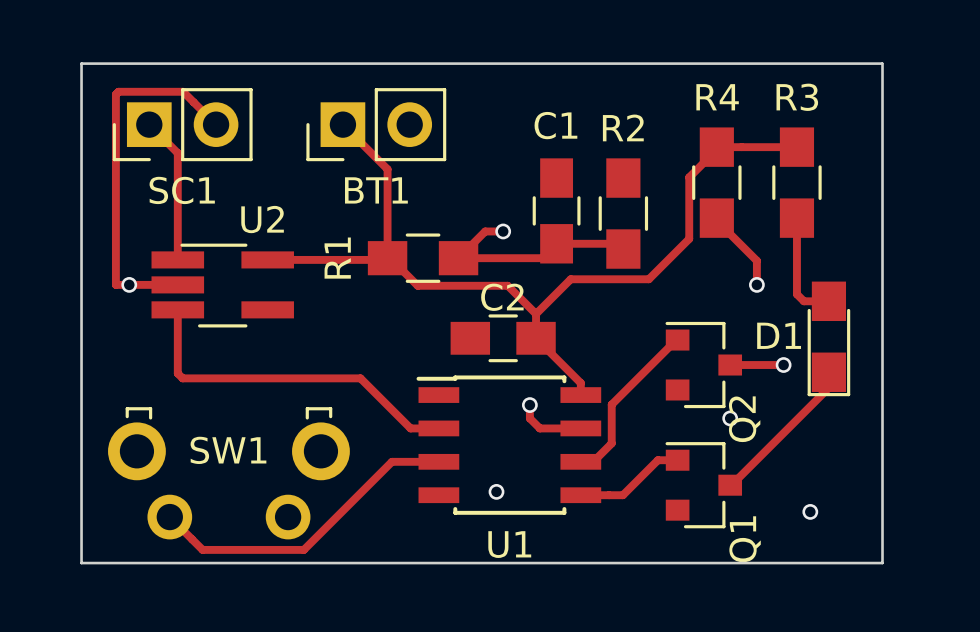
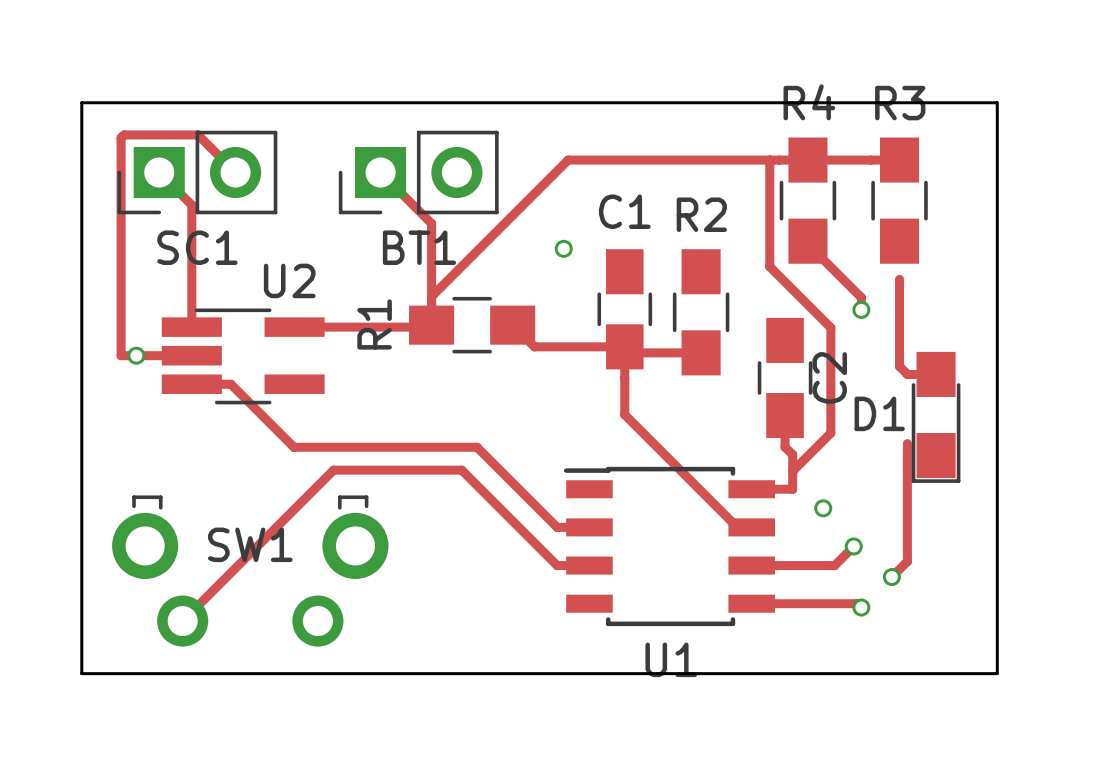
track: none -> (769, 160) (769, 266) (830, 327) (830, 433) (792, 471)
track: none -> (899, 160) (568, 160) (431, 296)
track: (796, 147) (716, 147) (716, 149) (689, 177) (689, 238) (648, 279) (570, 279) (536, 313) -> none
R4 position: (716, 182) -> (807, 200)
R3 position: (796, 182) -> (899, 200)
track: none -> (807, 241) (807, 244) (861, 297) (861, 309)
C1 position: (556, 210) -> (624, 309)
R2 position: (623, 213) -> (701, 312)
track: (716, 218) (716, 220) (756, 260) (756, 284) -> none
track: (503, 231) (485, 231) (458, 258) (542, 258) (556, 243) (618, 243) (623, 249) -> none
via position: (503, 231) -> (563, 248)
track: (390, 258) (417, 285) (507, 285) (536, 313) -> none
track: none -> (512, 325) (534, 346) (624, 346)
track: none -> (624, 346) (624, 414) (737, 527) (751, 527)
track: none -> (624, 346) (630, 352) (701, 352)
via position: (756, 284) -> (861, 309)
track: (177, 309) (177, 373) (182, 378) (360, 378) (410, 428) (438, 428) -> (191, 384) (230, 384) (293, 447) (477, 447) (557, 527) (589, 527)
track: (536, 313) (536, 338) (580, 383) (580, 395) -> none
track: none -> (785, 415) (785, 447) (792, 454) (792, 489) (751, 489)
C2 rotation: 0° (503, 338) -> 90° clockwise (785, 377)
C2 position: (503, 338) -> (785, 377)
track: (677, 340) (611, 404) (611, 443) (593, 461) (580, 461) -> none
track: none -> (907, 443) (907, 561) (891, 577)
Q2: (703, 365) -> none
track: (730, 365) (783, 365) -> none
via: (783, 365) -> none
track: (828, 372) (828, 387) (730, 485) -> none
track: (529, 405) (529, 418) (539, 428) (580, 428) -> none
via: (529, 405) -> none
U1 position: (508, 445) -> (669, 546)
track: none -> (853, 546) (834, 565) (751, 565)
via: none -> (853, 546)
track: (677, 460) (657, 460) (622, 495) (580, 495) -> none
track: (438, 461) (391, 461) (303, 549) (202, 549) (169, 517) -> (589, 565) (557, 565) (461, 470) (333, 470) (182, 621)
via: none -> (891, 577)
Q1: (703, 485) -> none
via: (496, 491) -> none
track: none -> (751, 603) (857, 603) (861, 607)
via: none -> (861, 607)
via: (810, 511) -> none

